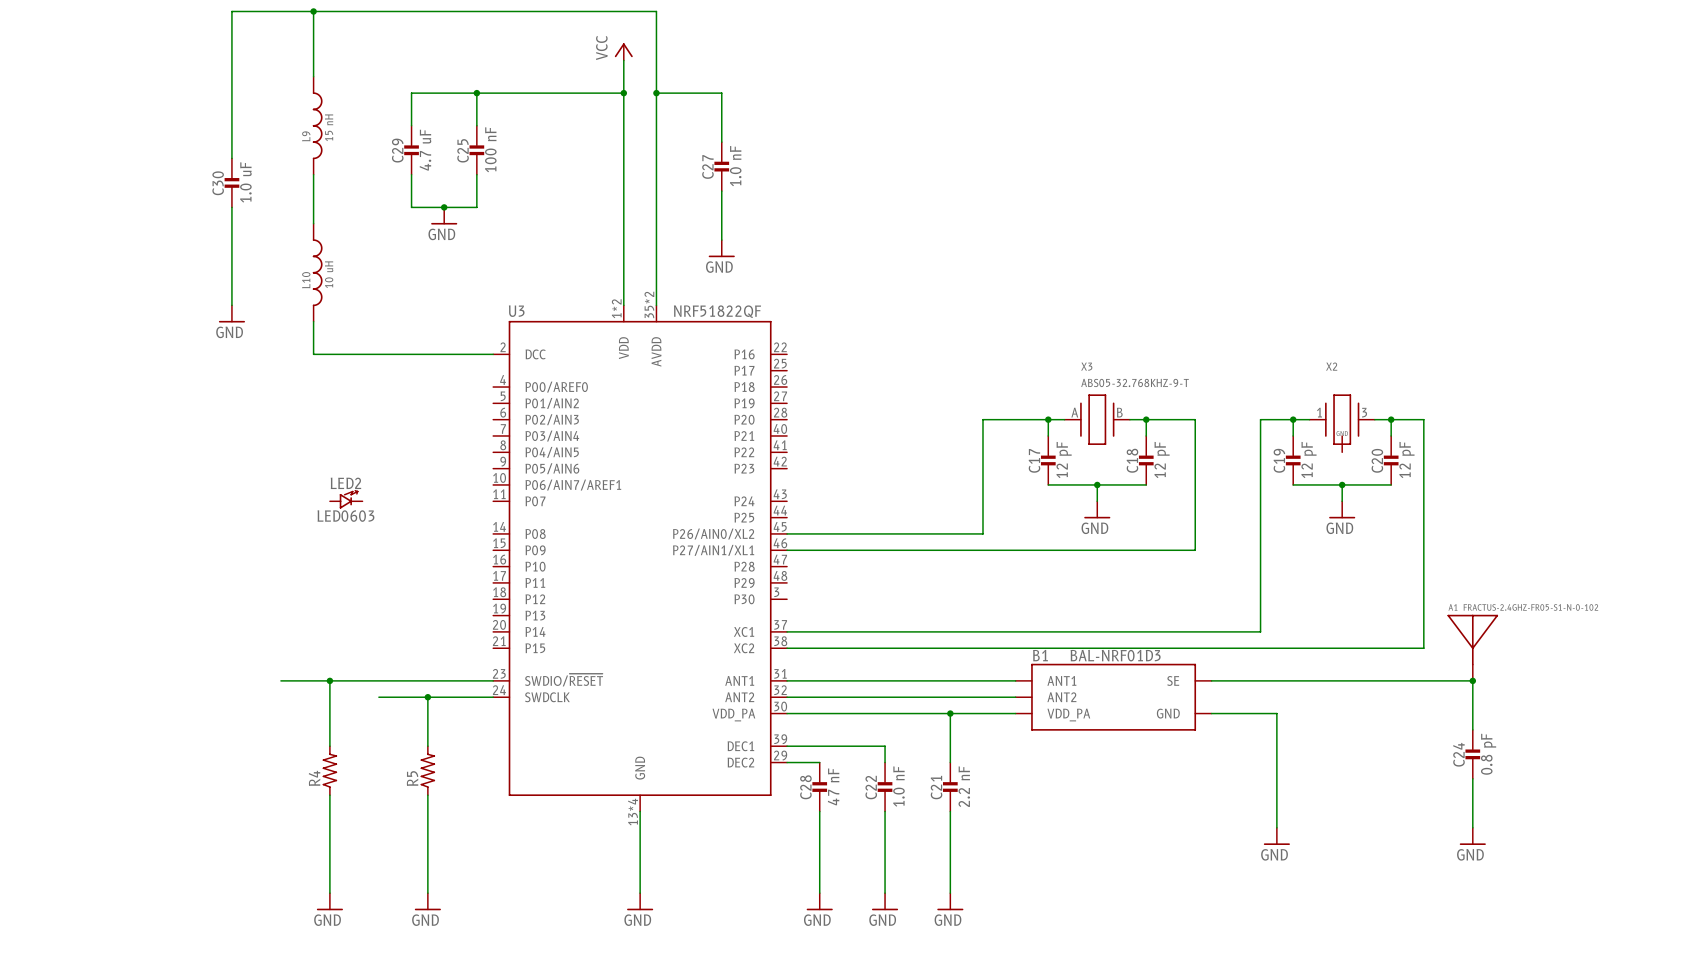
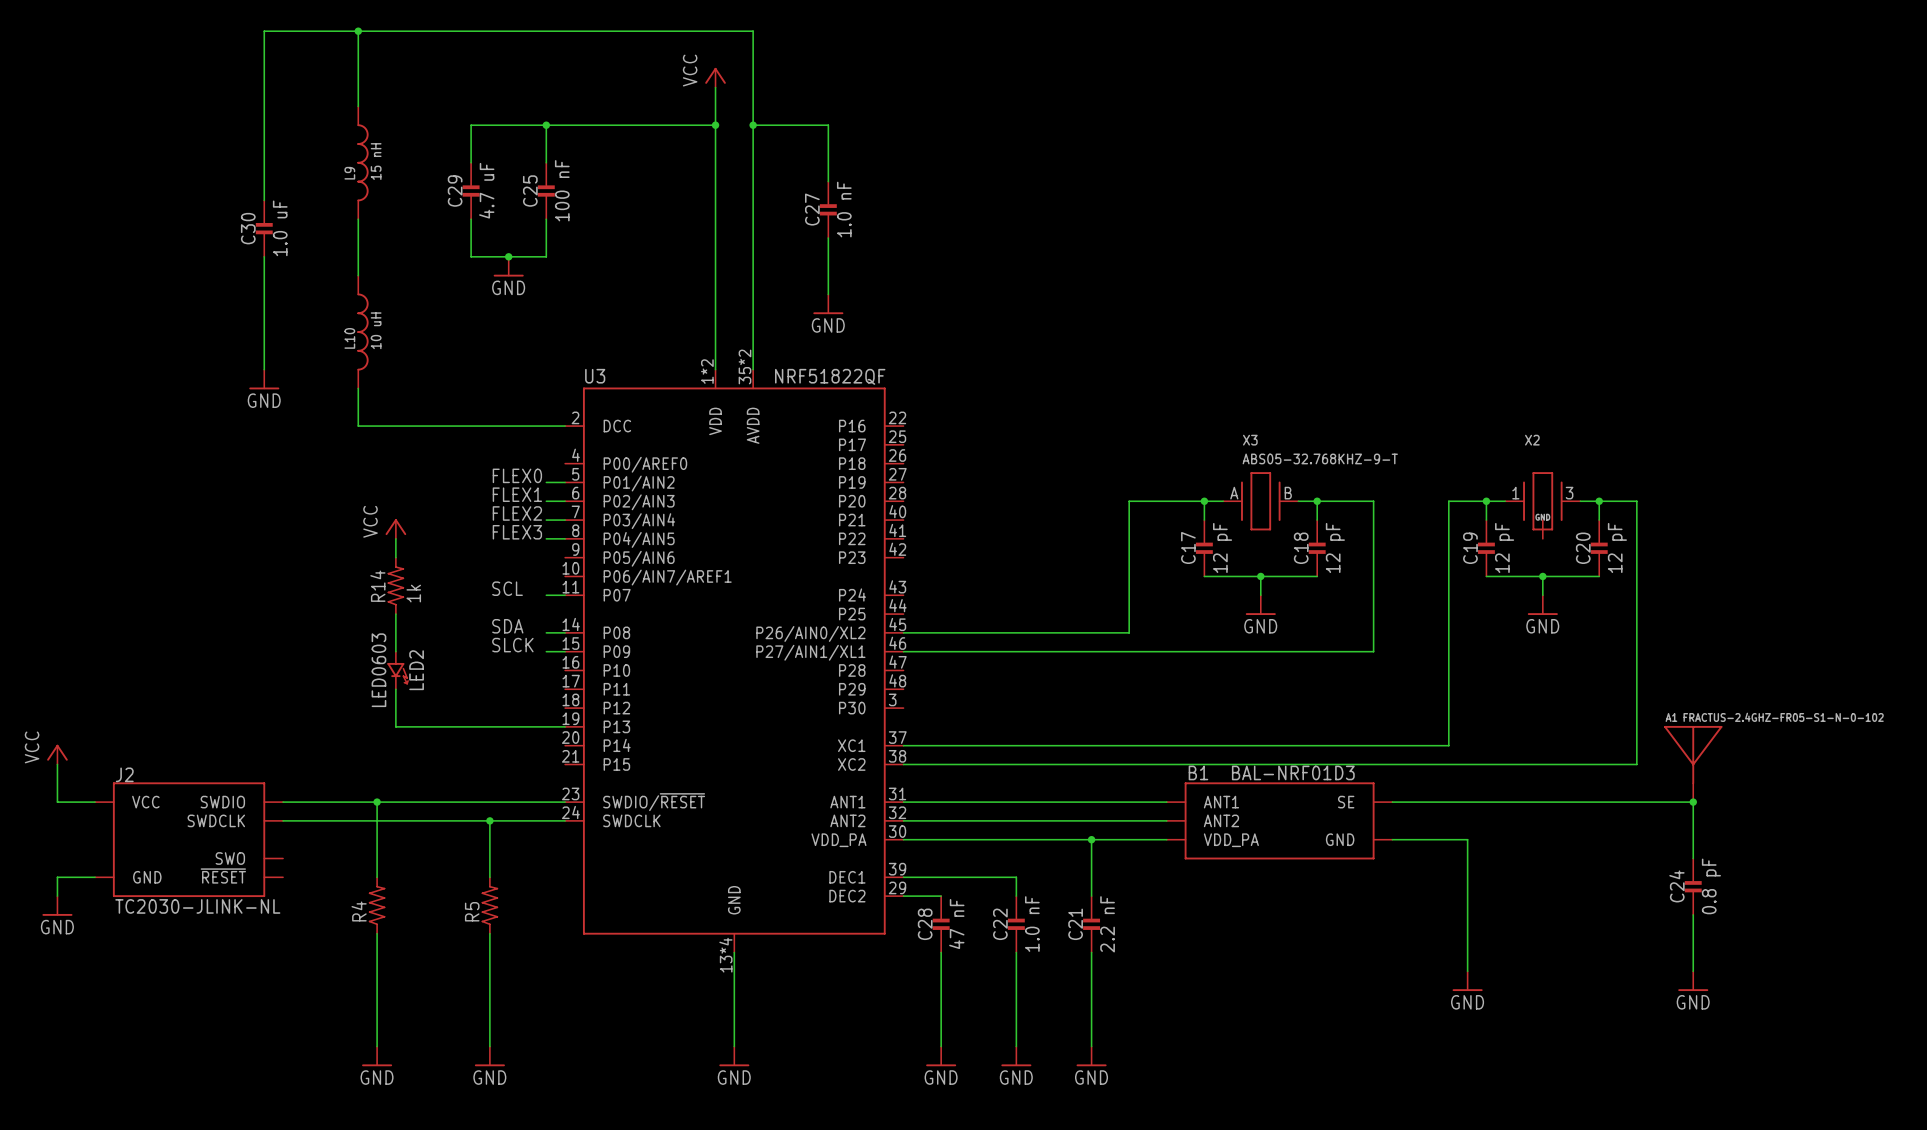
label: none -> FLEX0 (517, 475)
wire: none -> (546, 482) (565, 482)
label: none -> FLEX1 (517, 494)
wire: none -> (546, 501) (565, 501)
label: none -> FLEX2 (517, 513)
wire: none -> (546, 520) (565, 520)
power symbol: none -> VCC (395, 528)
label: none -> FLEX3 (517, 532)
wire: none -> (395, 538) (395, 557)
wire: none -> (546, 538) (565, 538)
R14: none -> 1k (395, 585)
label: none -> SCL (507, 588)
LED2 rotation: 0° (346, 499) -> 90° clockwise (398, 670)
LED2 position: (346, 499) -> (398, 670)
wire: none -> (546, 595) (565, 595)
wire: none -> (395, 614) (395, 651)
label: none -> SDA (507, 626)
wire: none -> (546, 632) (565, 632)
label: none -> SLCK (512, 645)
wire: none -> (546, 651) (565, 651)
wire: none -> (395, 689) (395, 726) (565, 726)
power symbol: none -> VCC (57, 754)
wire: none -> (57, 764) (57, 802) (95, 802)
wire: none -> (283, 802) (320, 802)
wire: none -> (283, 820) (433, 820)
J2: none -> TC2030-JLINK-NL (189, 839)
wire: none -> (95, 877) (57, 877) (57, 896)
power symbol: none -> GND (57, 905)

